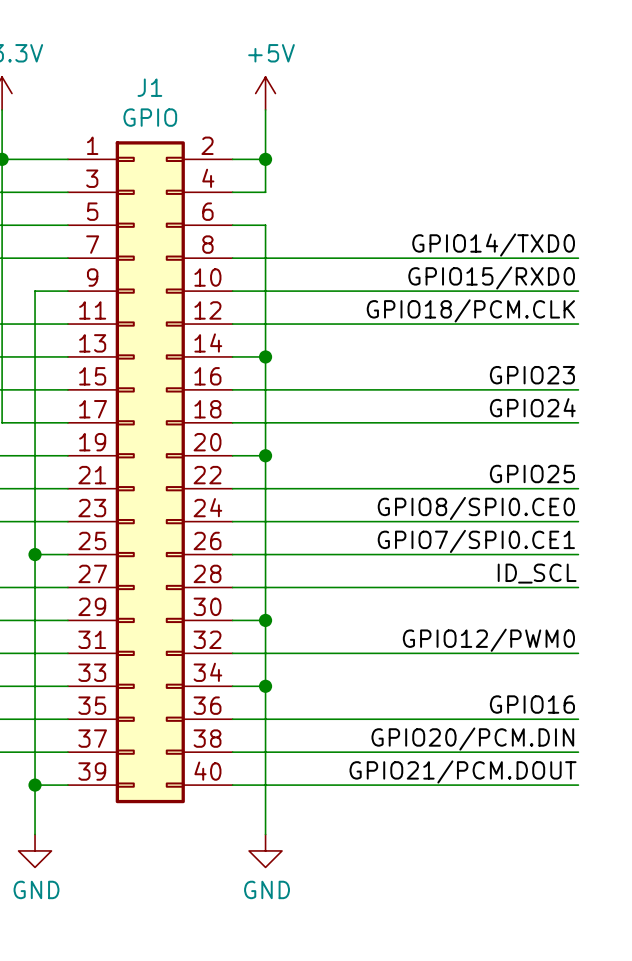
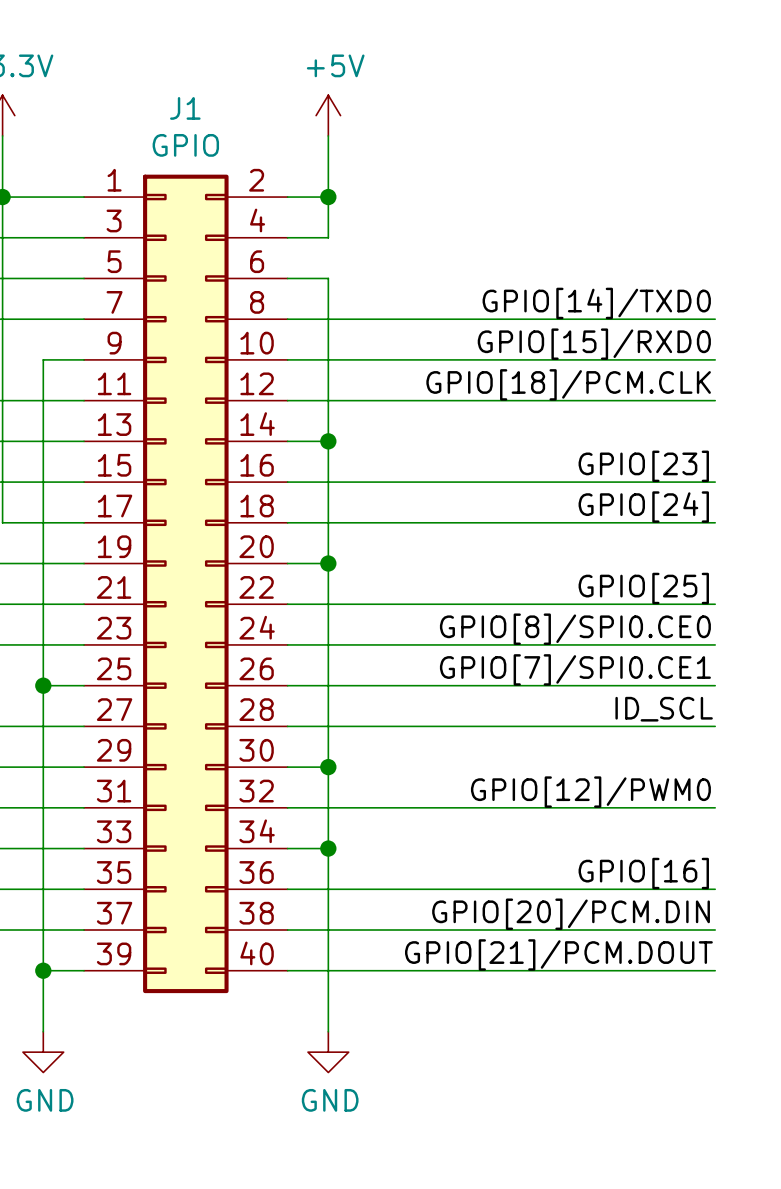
label: GPIO14/TXD0 (493, 245) -> GPIO[14]/TXD0 (596, 303)
label: GPIO15/RXD0 (491, 277) -> GPIO[15]/RXD0 (594, 344)
label: GPIO18/PCM.CLK (470, 310) -> GPIO[18]/PCM.CLK (568, 384)
label: GPIO23 (532, 375) -> GPIO[23] (643, 466)
label: GPIO24 (532, 407) -> GPIO[24] (643, 507)
label: GPIO25 (532, 474) -> GPIO[25] (643, 588)
label: GPIO8/SPI0.CE0 (476, 508) -> GPIO[8]/SPI0.CE0 (575, 629)
label: GPIO7/SPI0.CE1 (476, 541) -> GPIO[7]/SPI0.CE1 (575, 669)
label: GPIO12/PWM0 (488, 640) -> GPIO[12]/PWM0 (590, 792)
label: GPIO16 (532, 704) -> GPIO[16] (643, 873)
label: GPIO20/PCM.DIN (472, 739) -> GPIO[20]/PCM.DIN (571, 914)
label: GPIO21/PCM.DOUT (463, 771) -> GPIO[21]/PCM.DOUT (558, 954)

